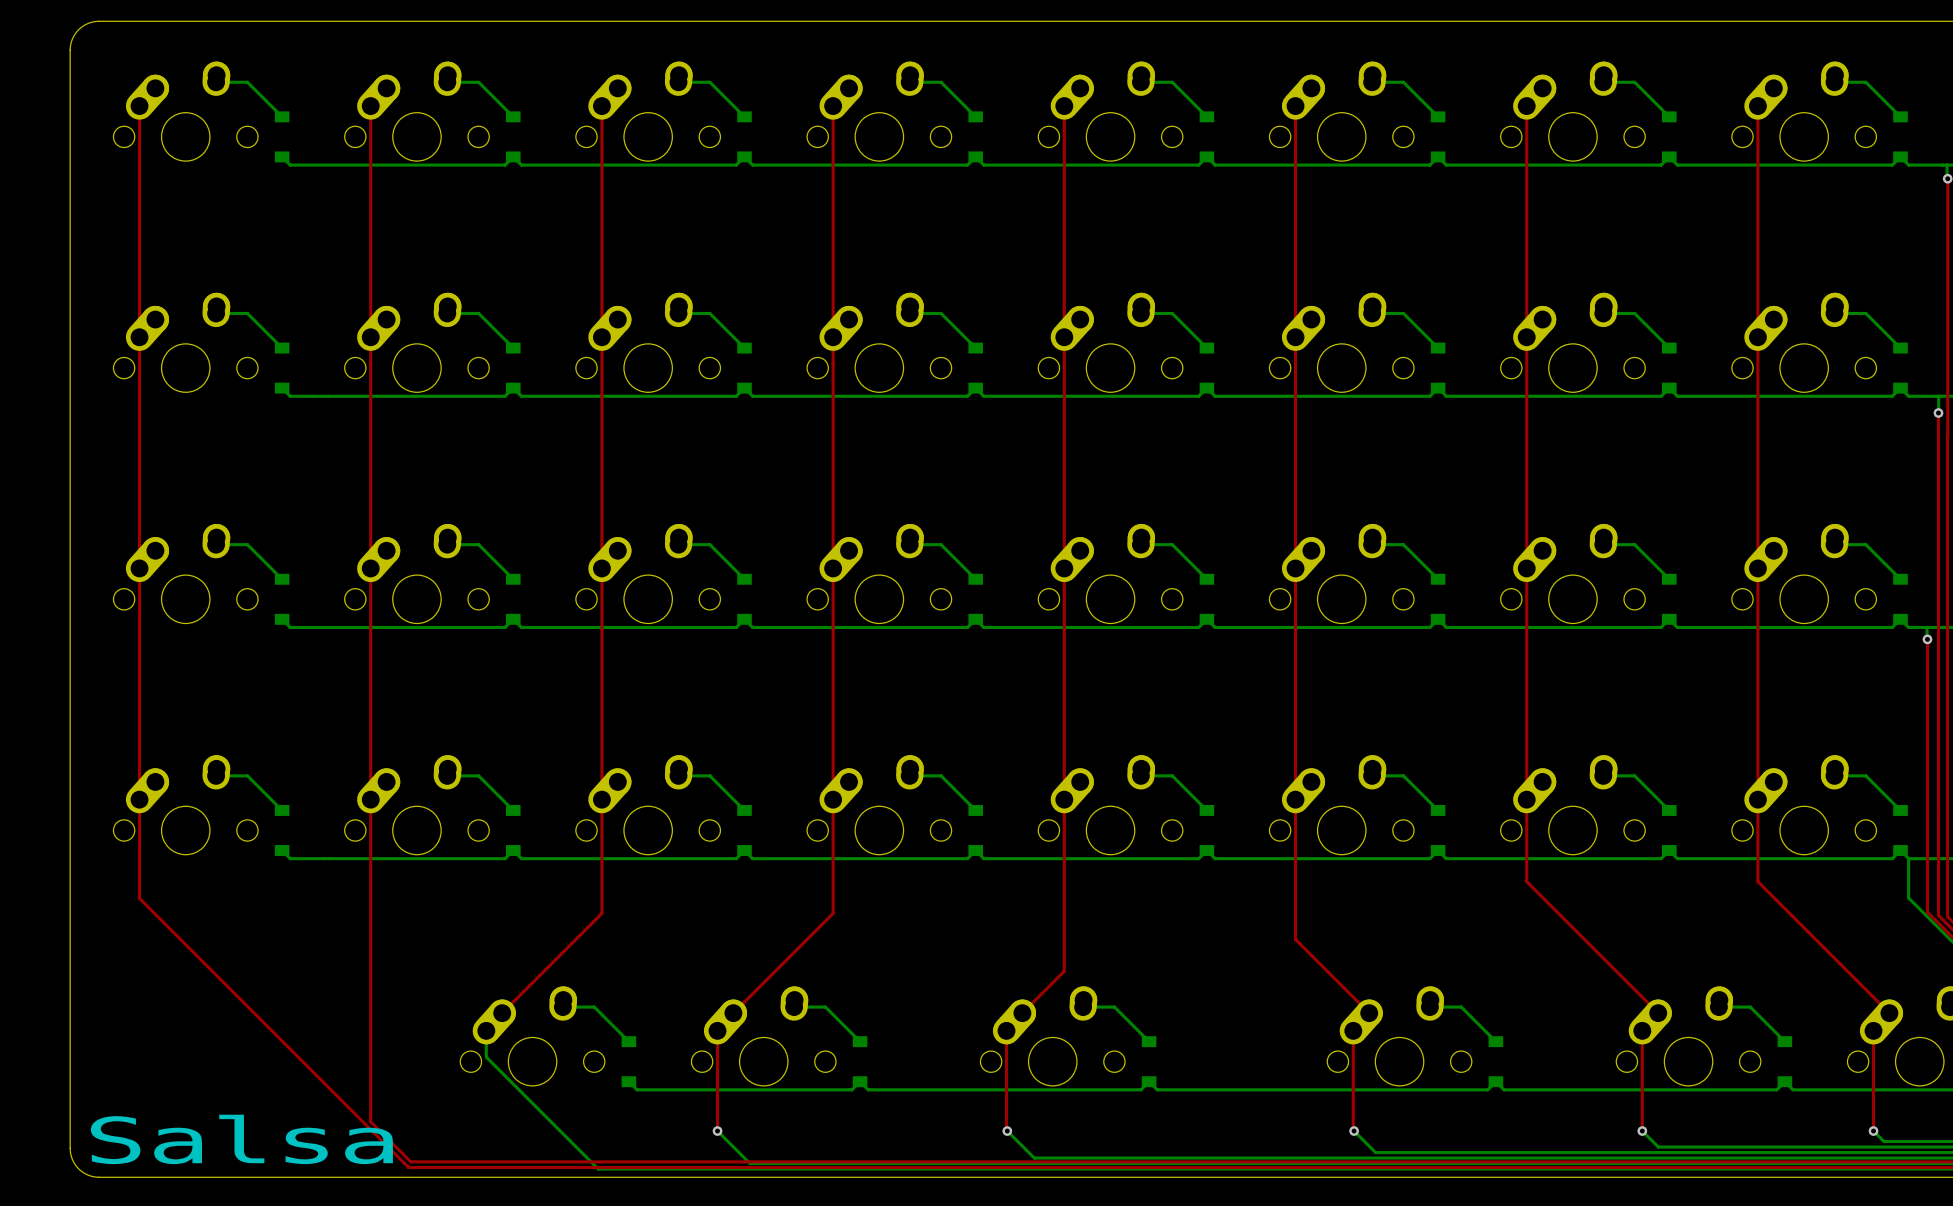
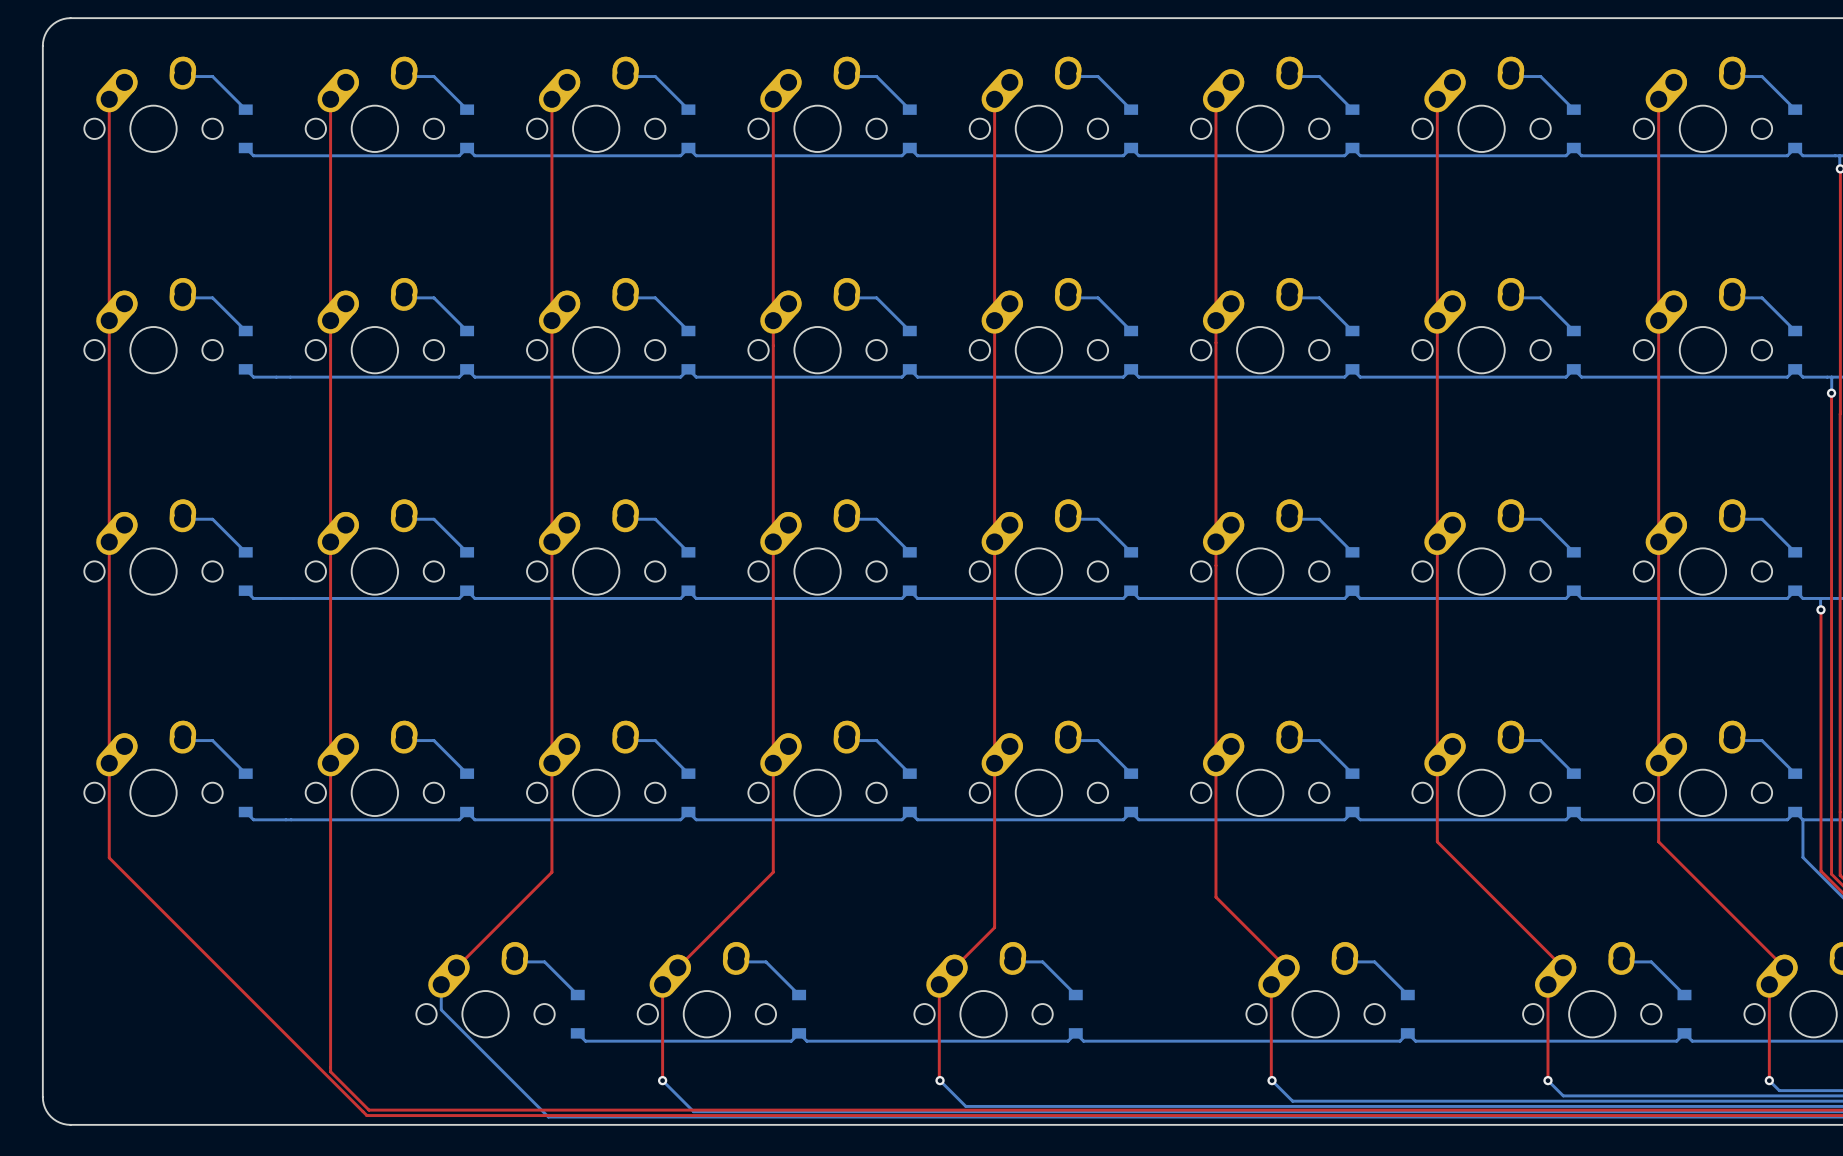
text: Salsa (241, 1139) -> none

